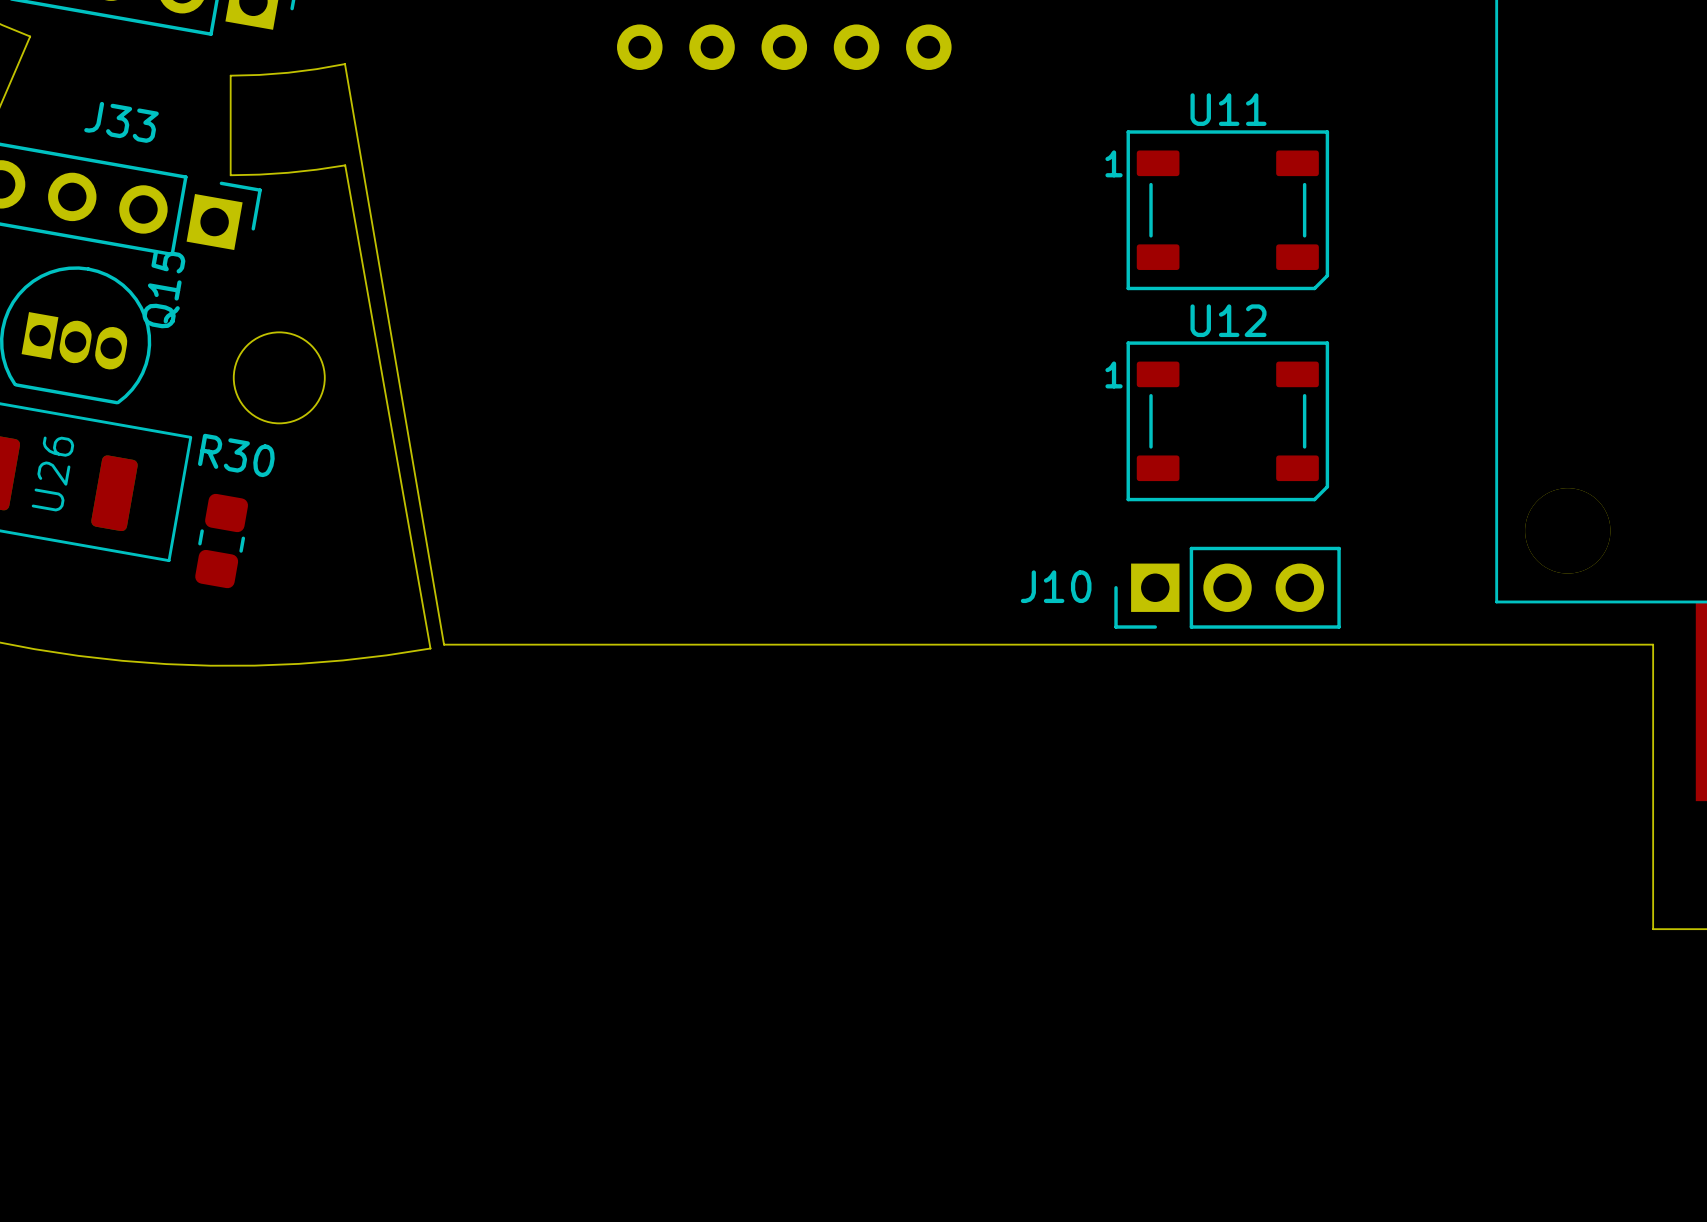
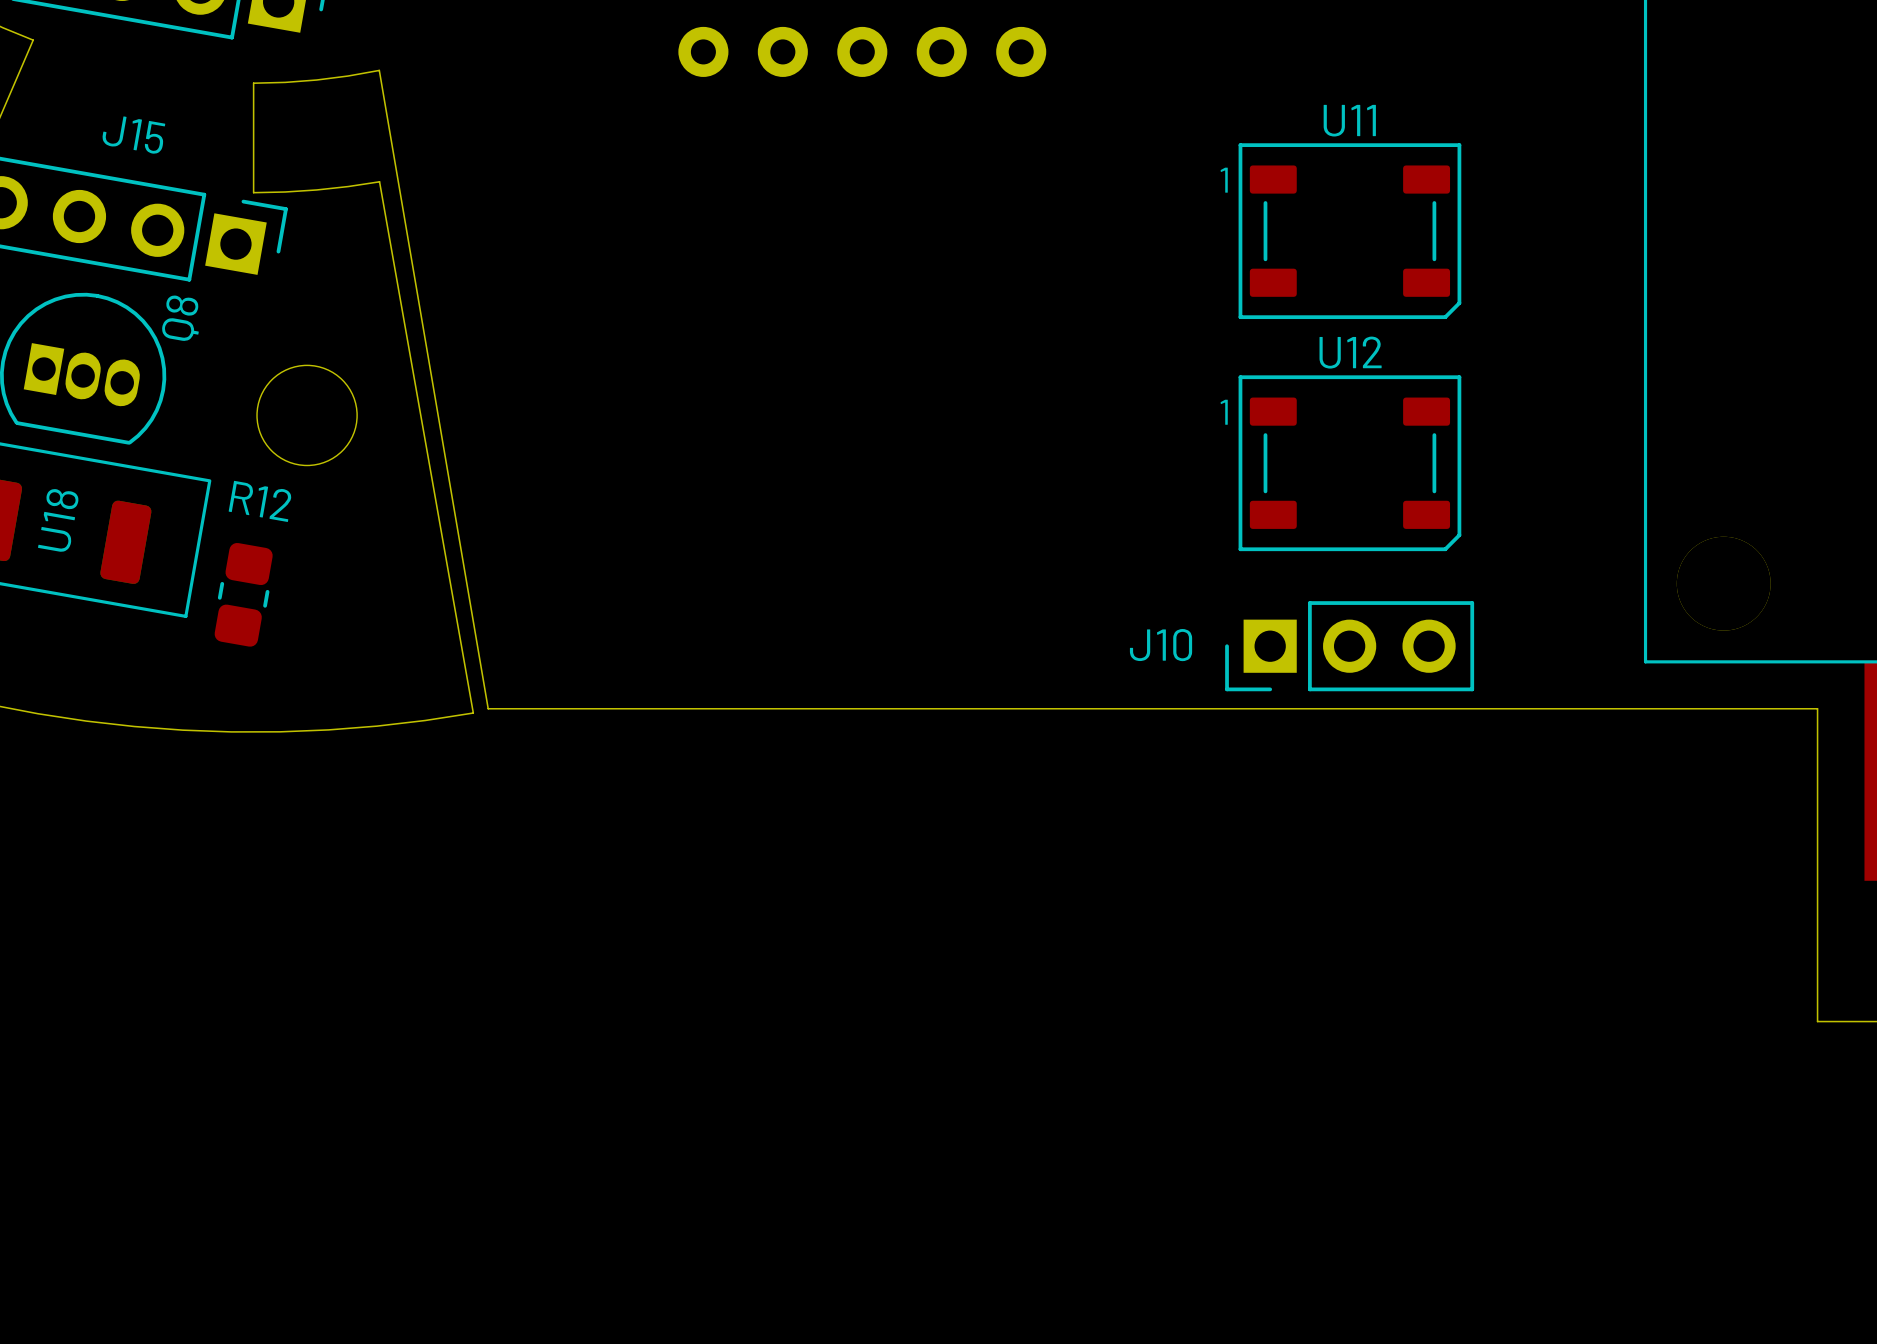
J33 name: J33 (121, 122) -> J15 (133, 135)
Q15 name: Q15 (163, 289) -> Q8 (180, 318)
R30 name: R30 (236, 455) -> R12 (260, 501)
U26 name: U26 (52, 473) -> U18 (58, 520)

